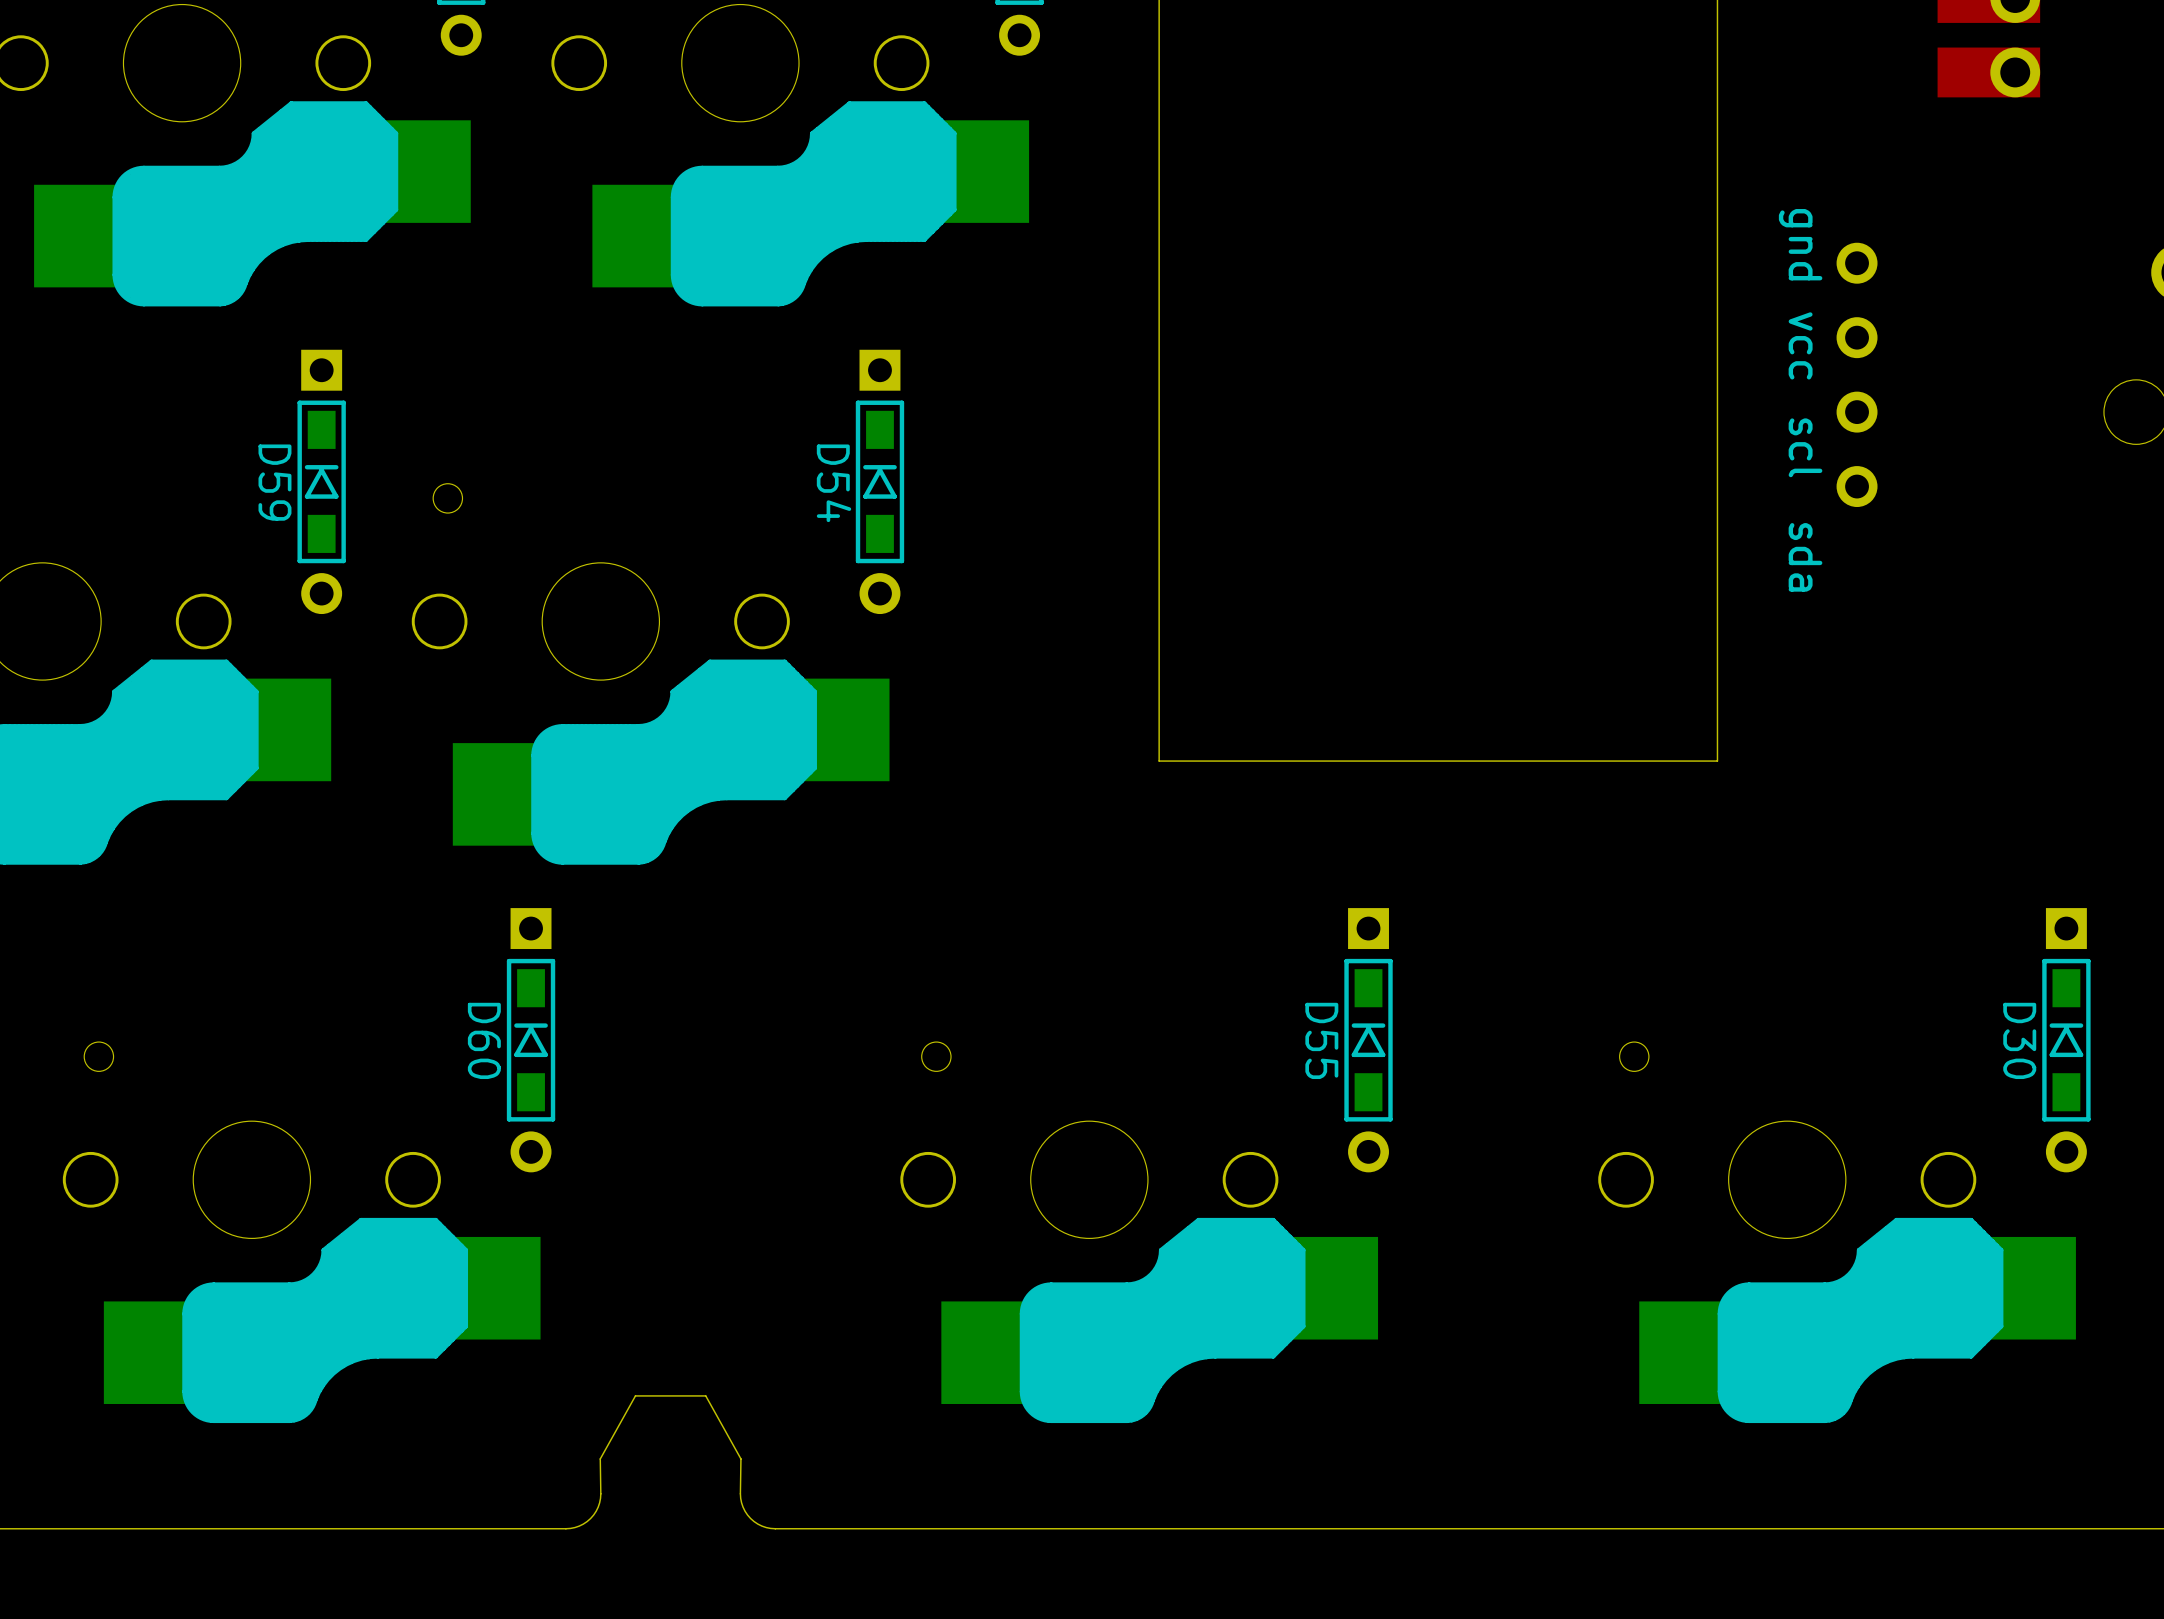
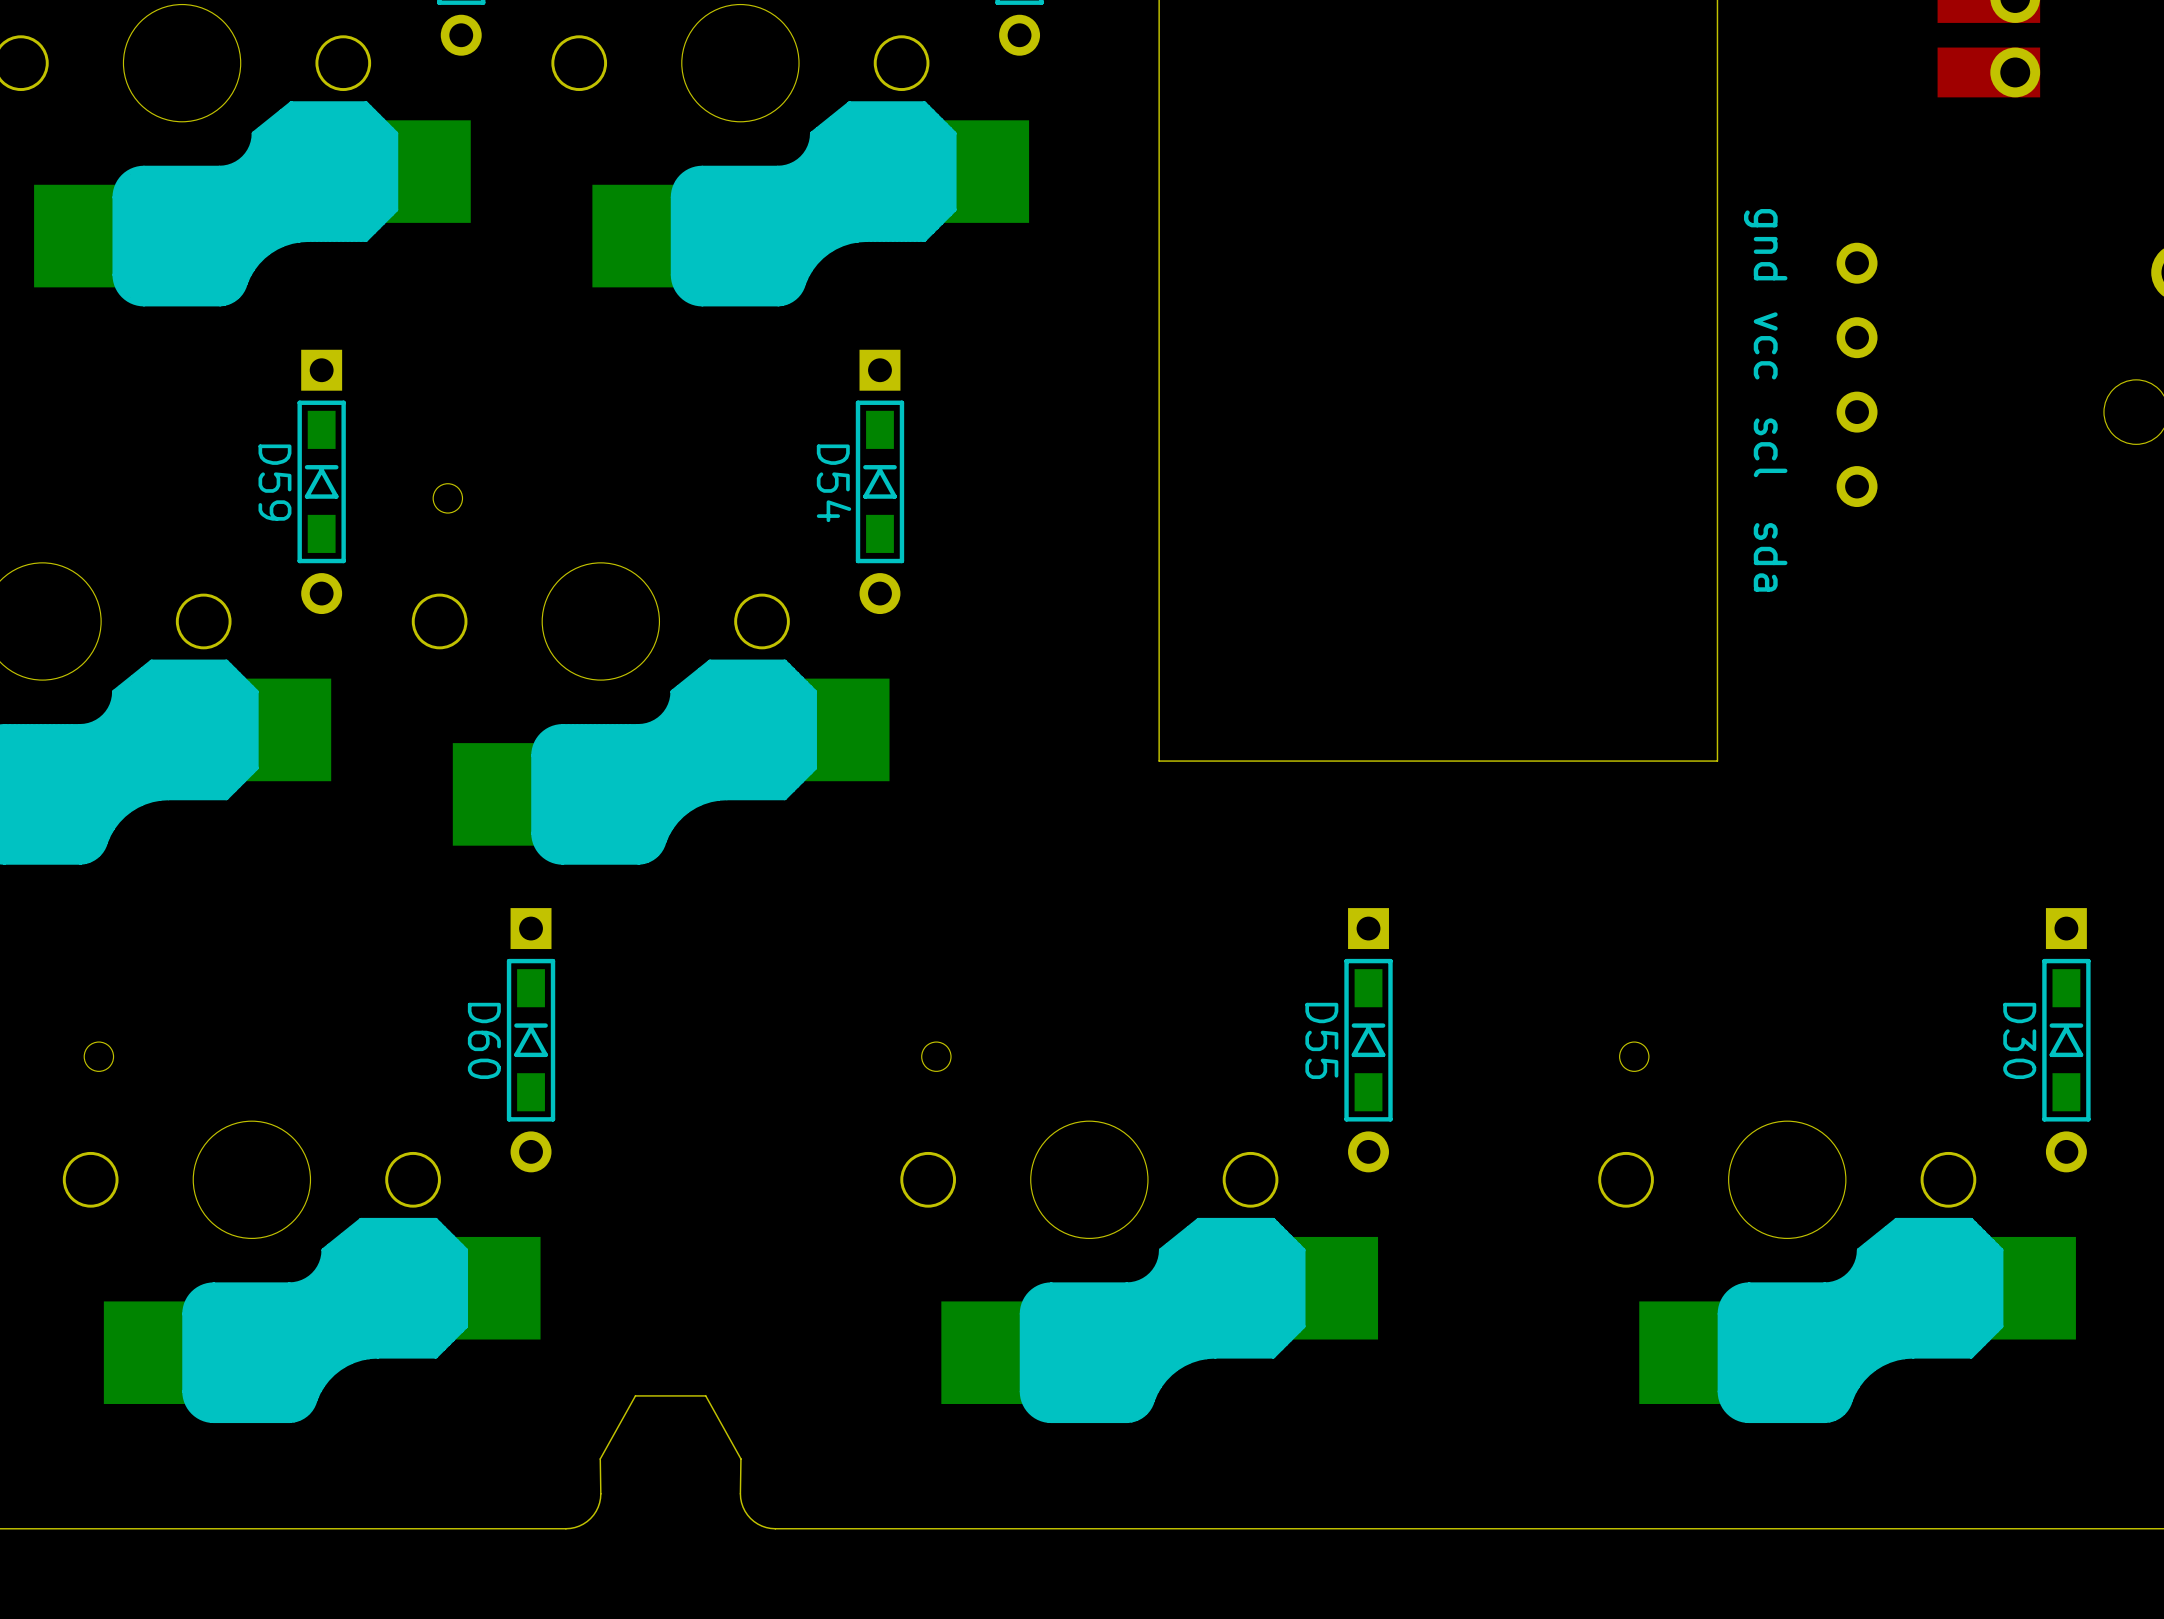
text position: gnd (1800, 244) -> gnd (1765, 244)
text position: vcc (1800, 345) -> vcc (1765, 345)
text position: scl (1805, 447) -> scl (1770, 447)
text position: sda (1805, 557) -> sda (1770, 557)

